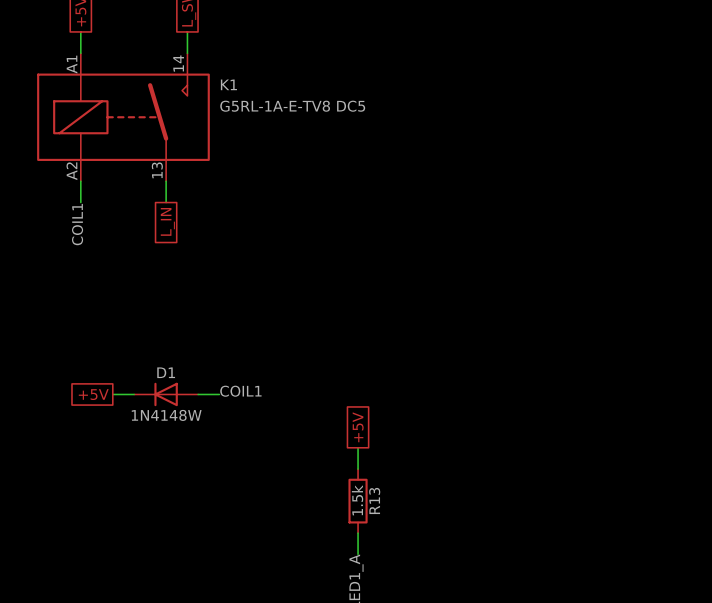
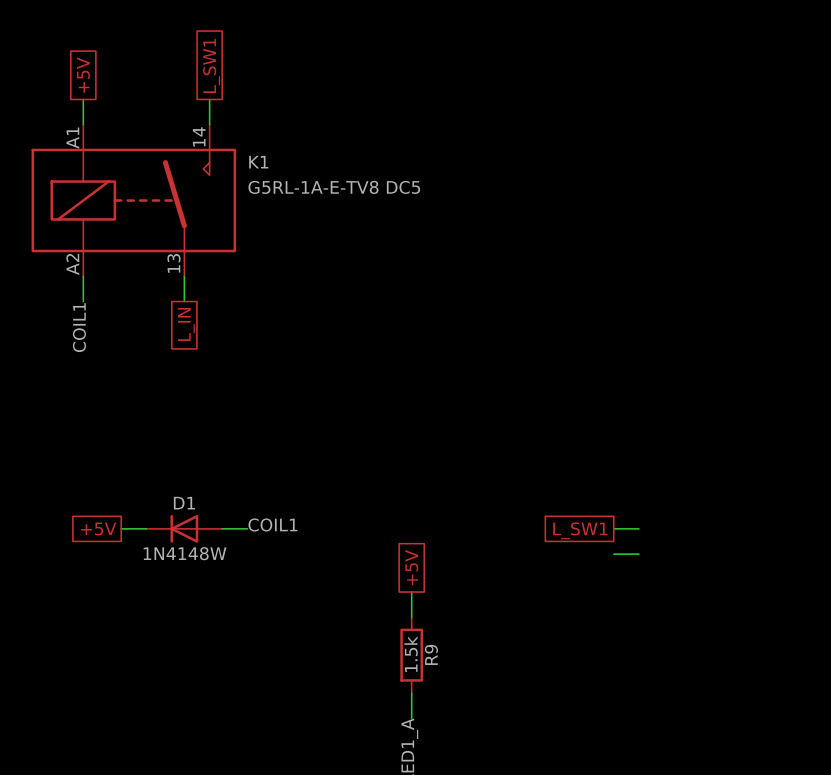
wire: none -> (613, 528) (639, 528)
global label: none -> L_SW1 (580, 530)
wire: none -> (613, 554) (639, 554)
R13 name: R13 (374, 500) -> R9 (431, 654)

